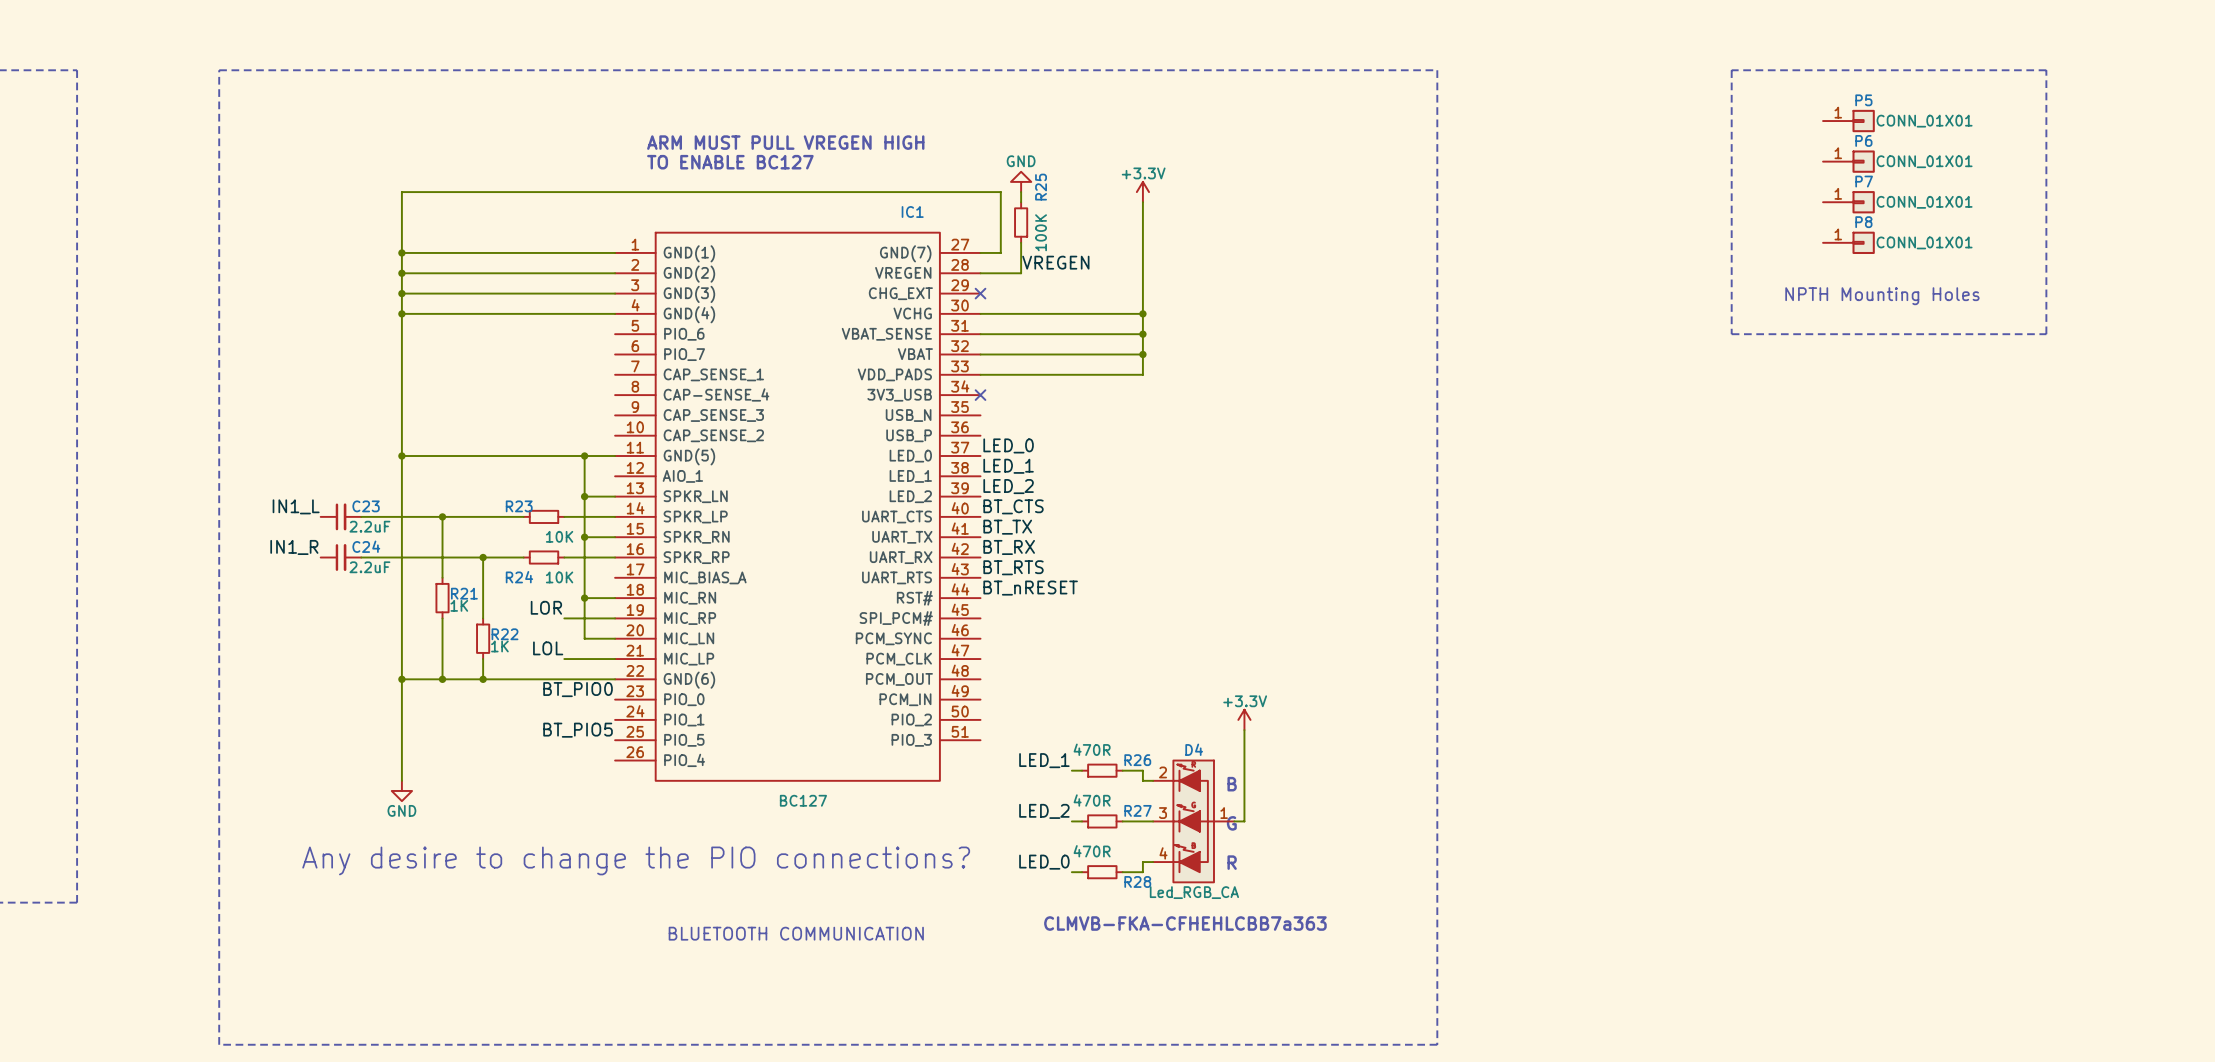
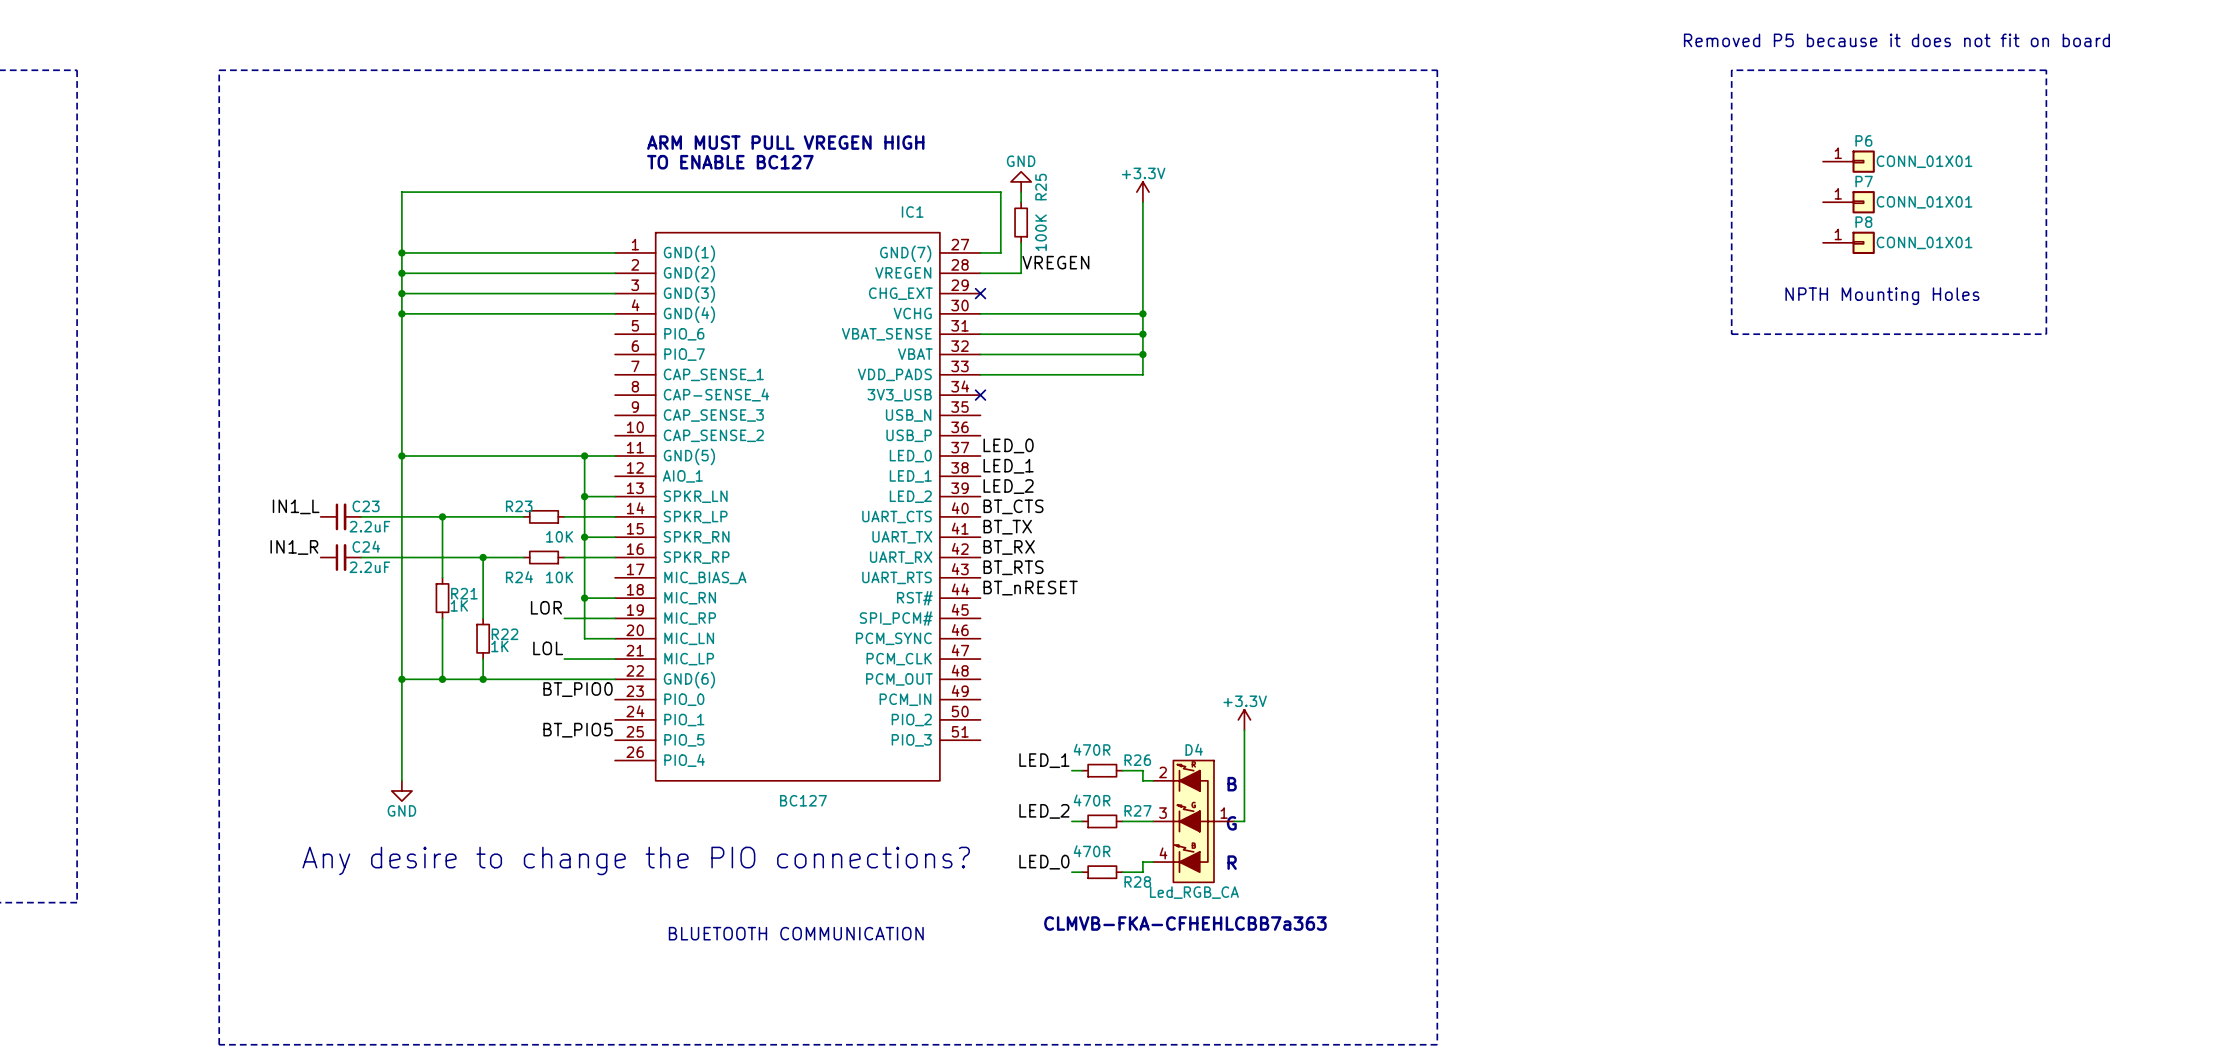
text: none -> Removed P5 because it does not fit on board (1896, 40)
P5: CONN_01X01 (1848, 121) -> none

